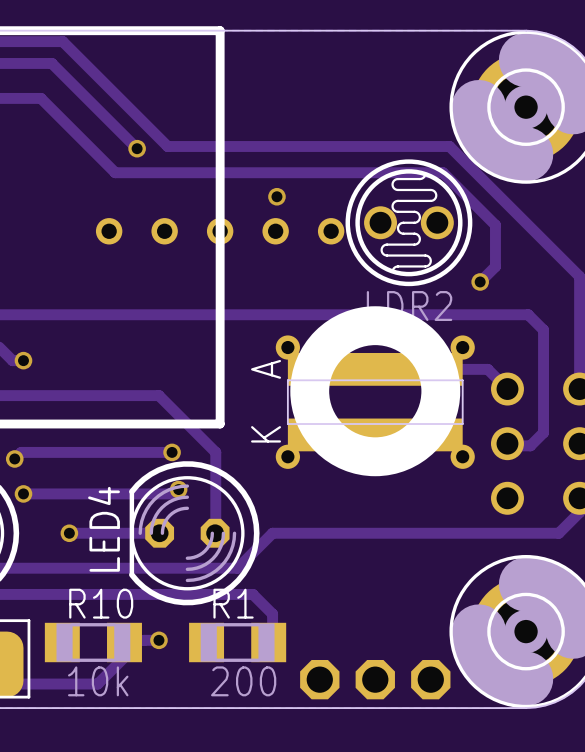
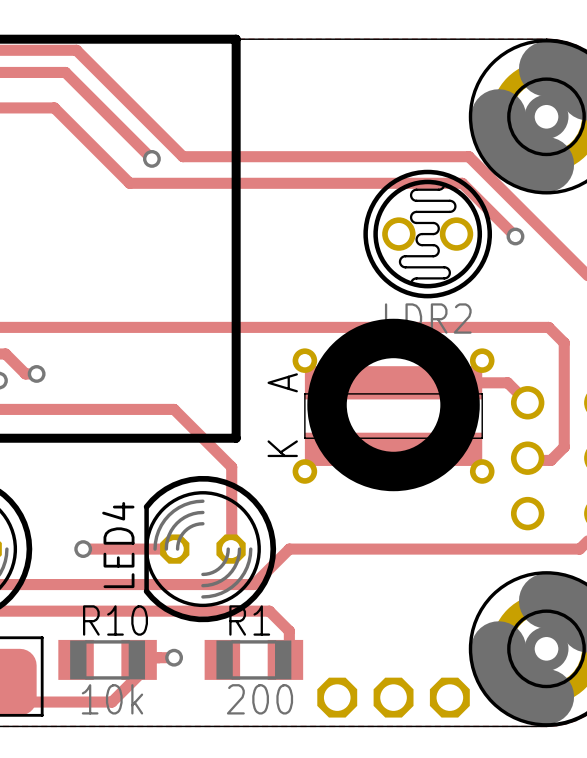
via: (276, 196) -> none
track: (495, 225) (495, 266) (480, 281) -> none
part: (220, 231) -> none
via position: (480, 281) -> (515, 236)
track: (172, 452) (21, 452) (14, 458) -> none
via: (172, 452) -> none
via: (14, 458) -> none
track: (178, 489) (174, 493) (23, 493) -> none
via: (178, 489) -> none
via: (23, 493) -> none

